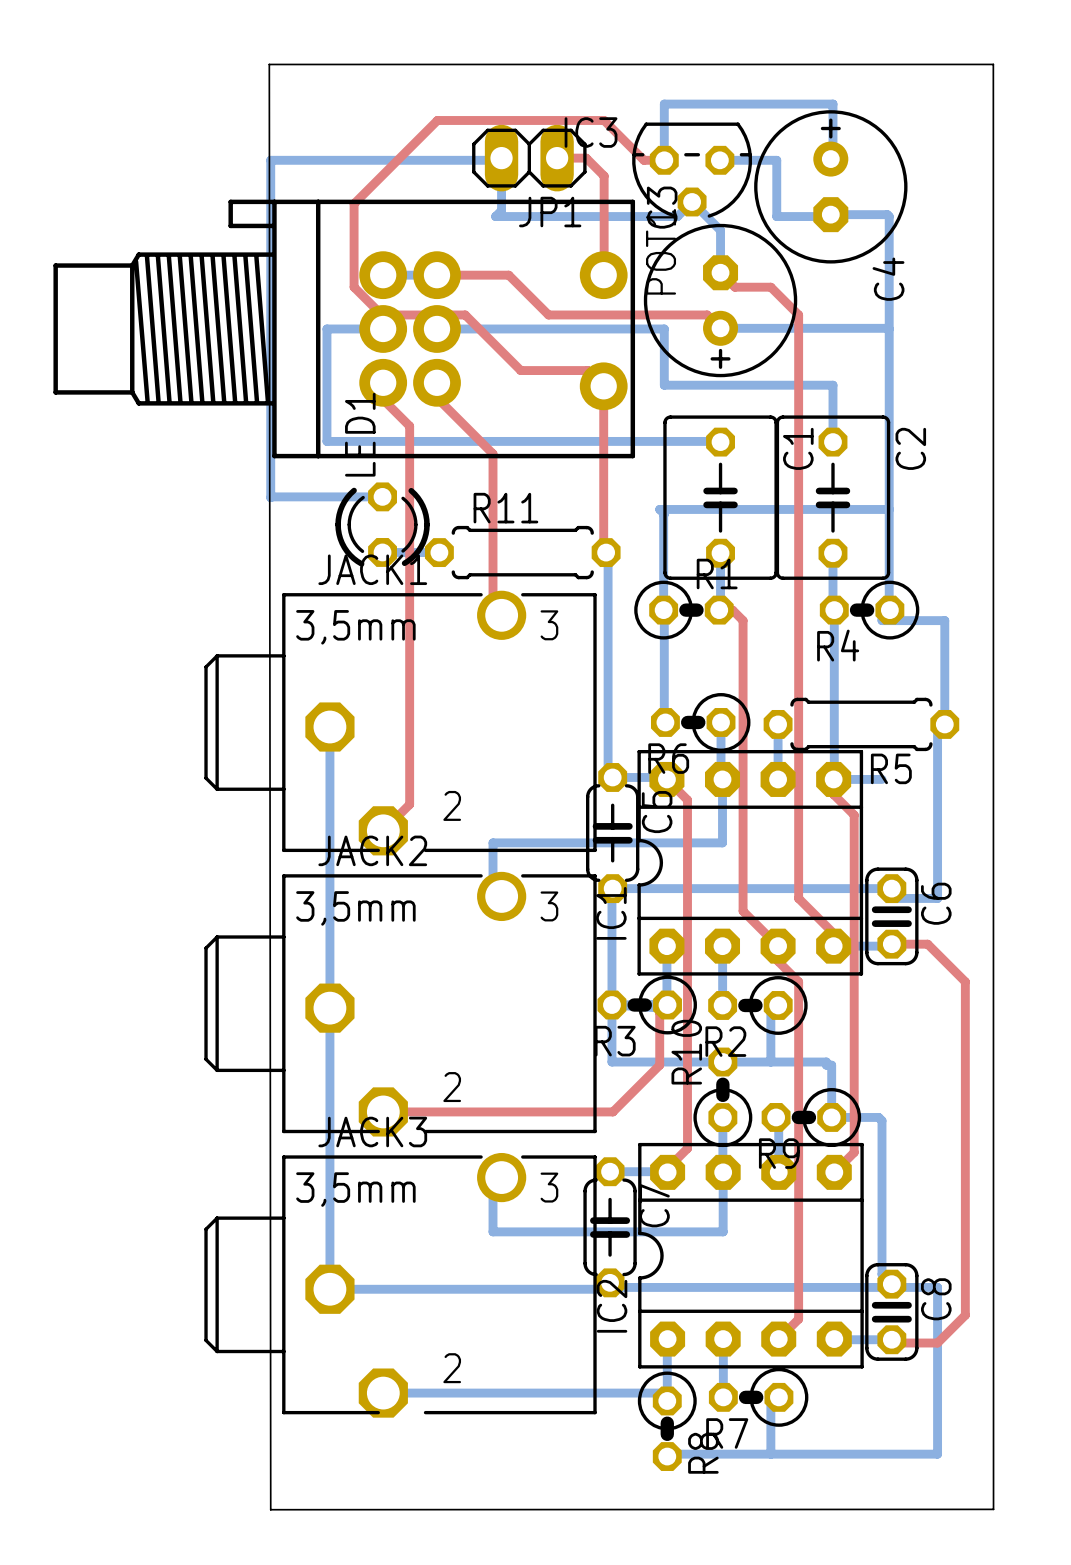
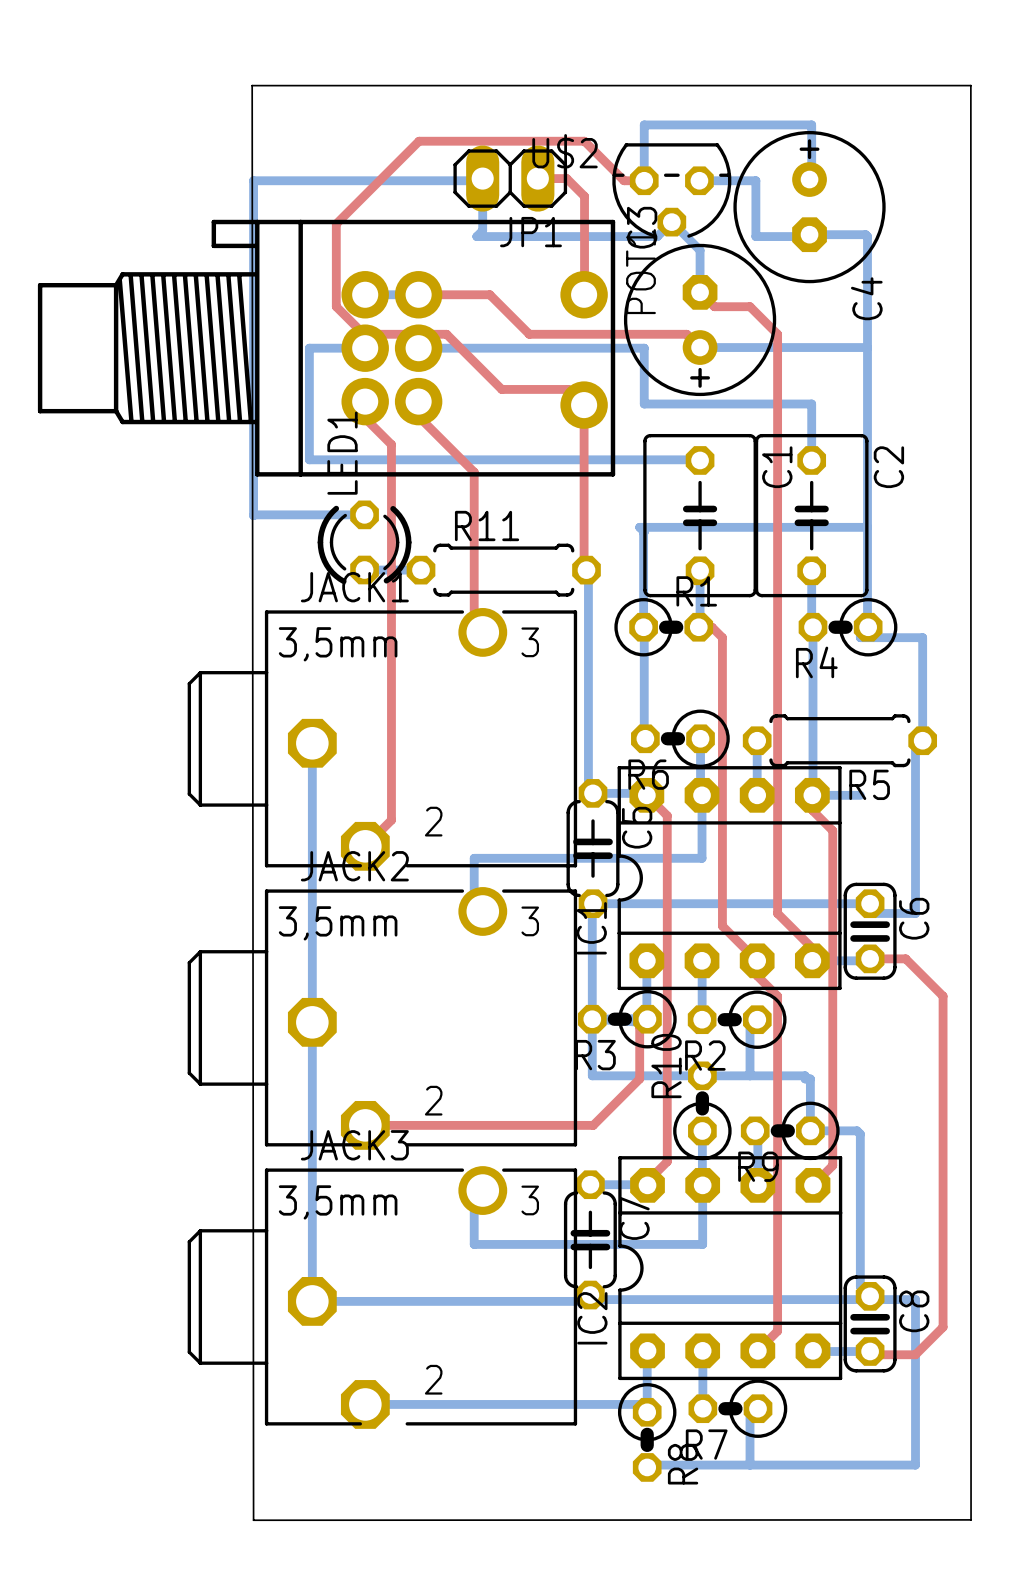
IC3 name: IC3 (591, 132) -> U$2 (565, 153)

